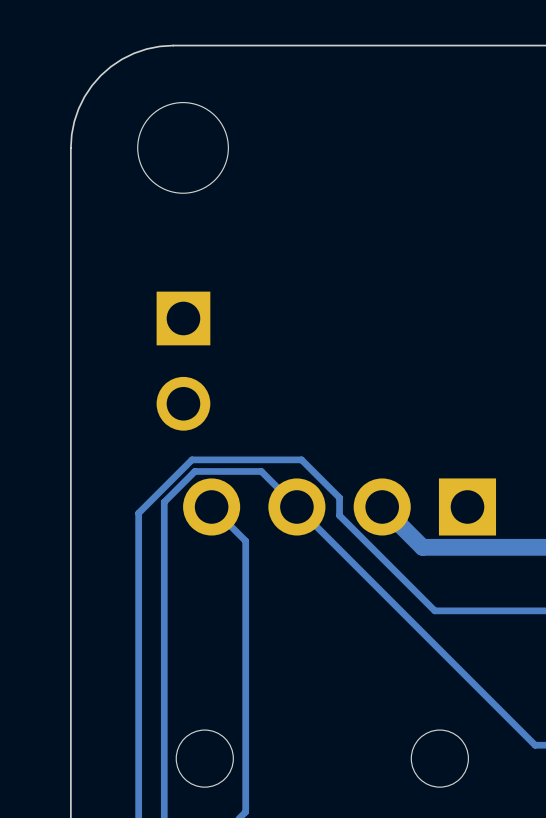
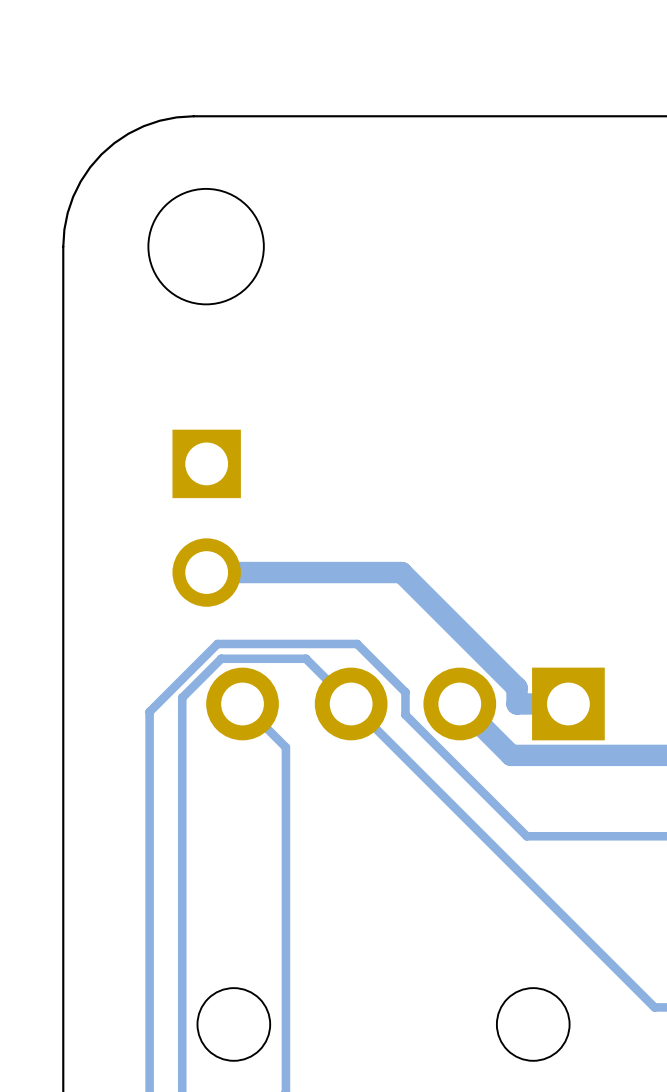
track: none -> (206, 572) (401, 572) (517, 687) (517, 703) (568, 703)

